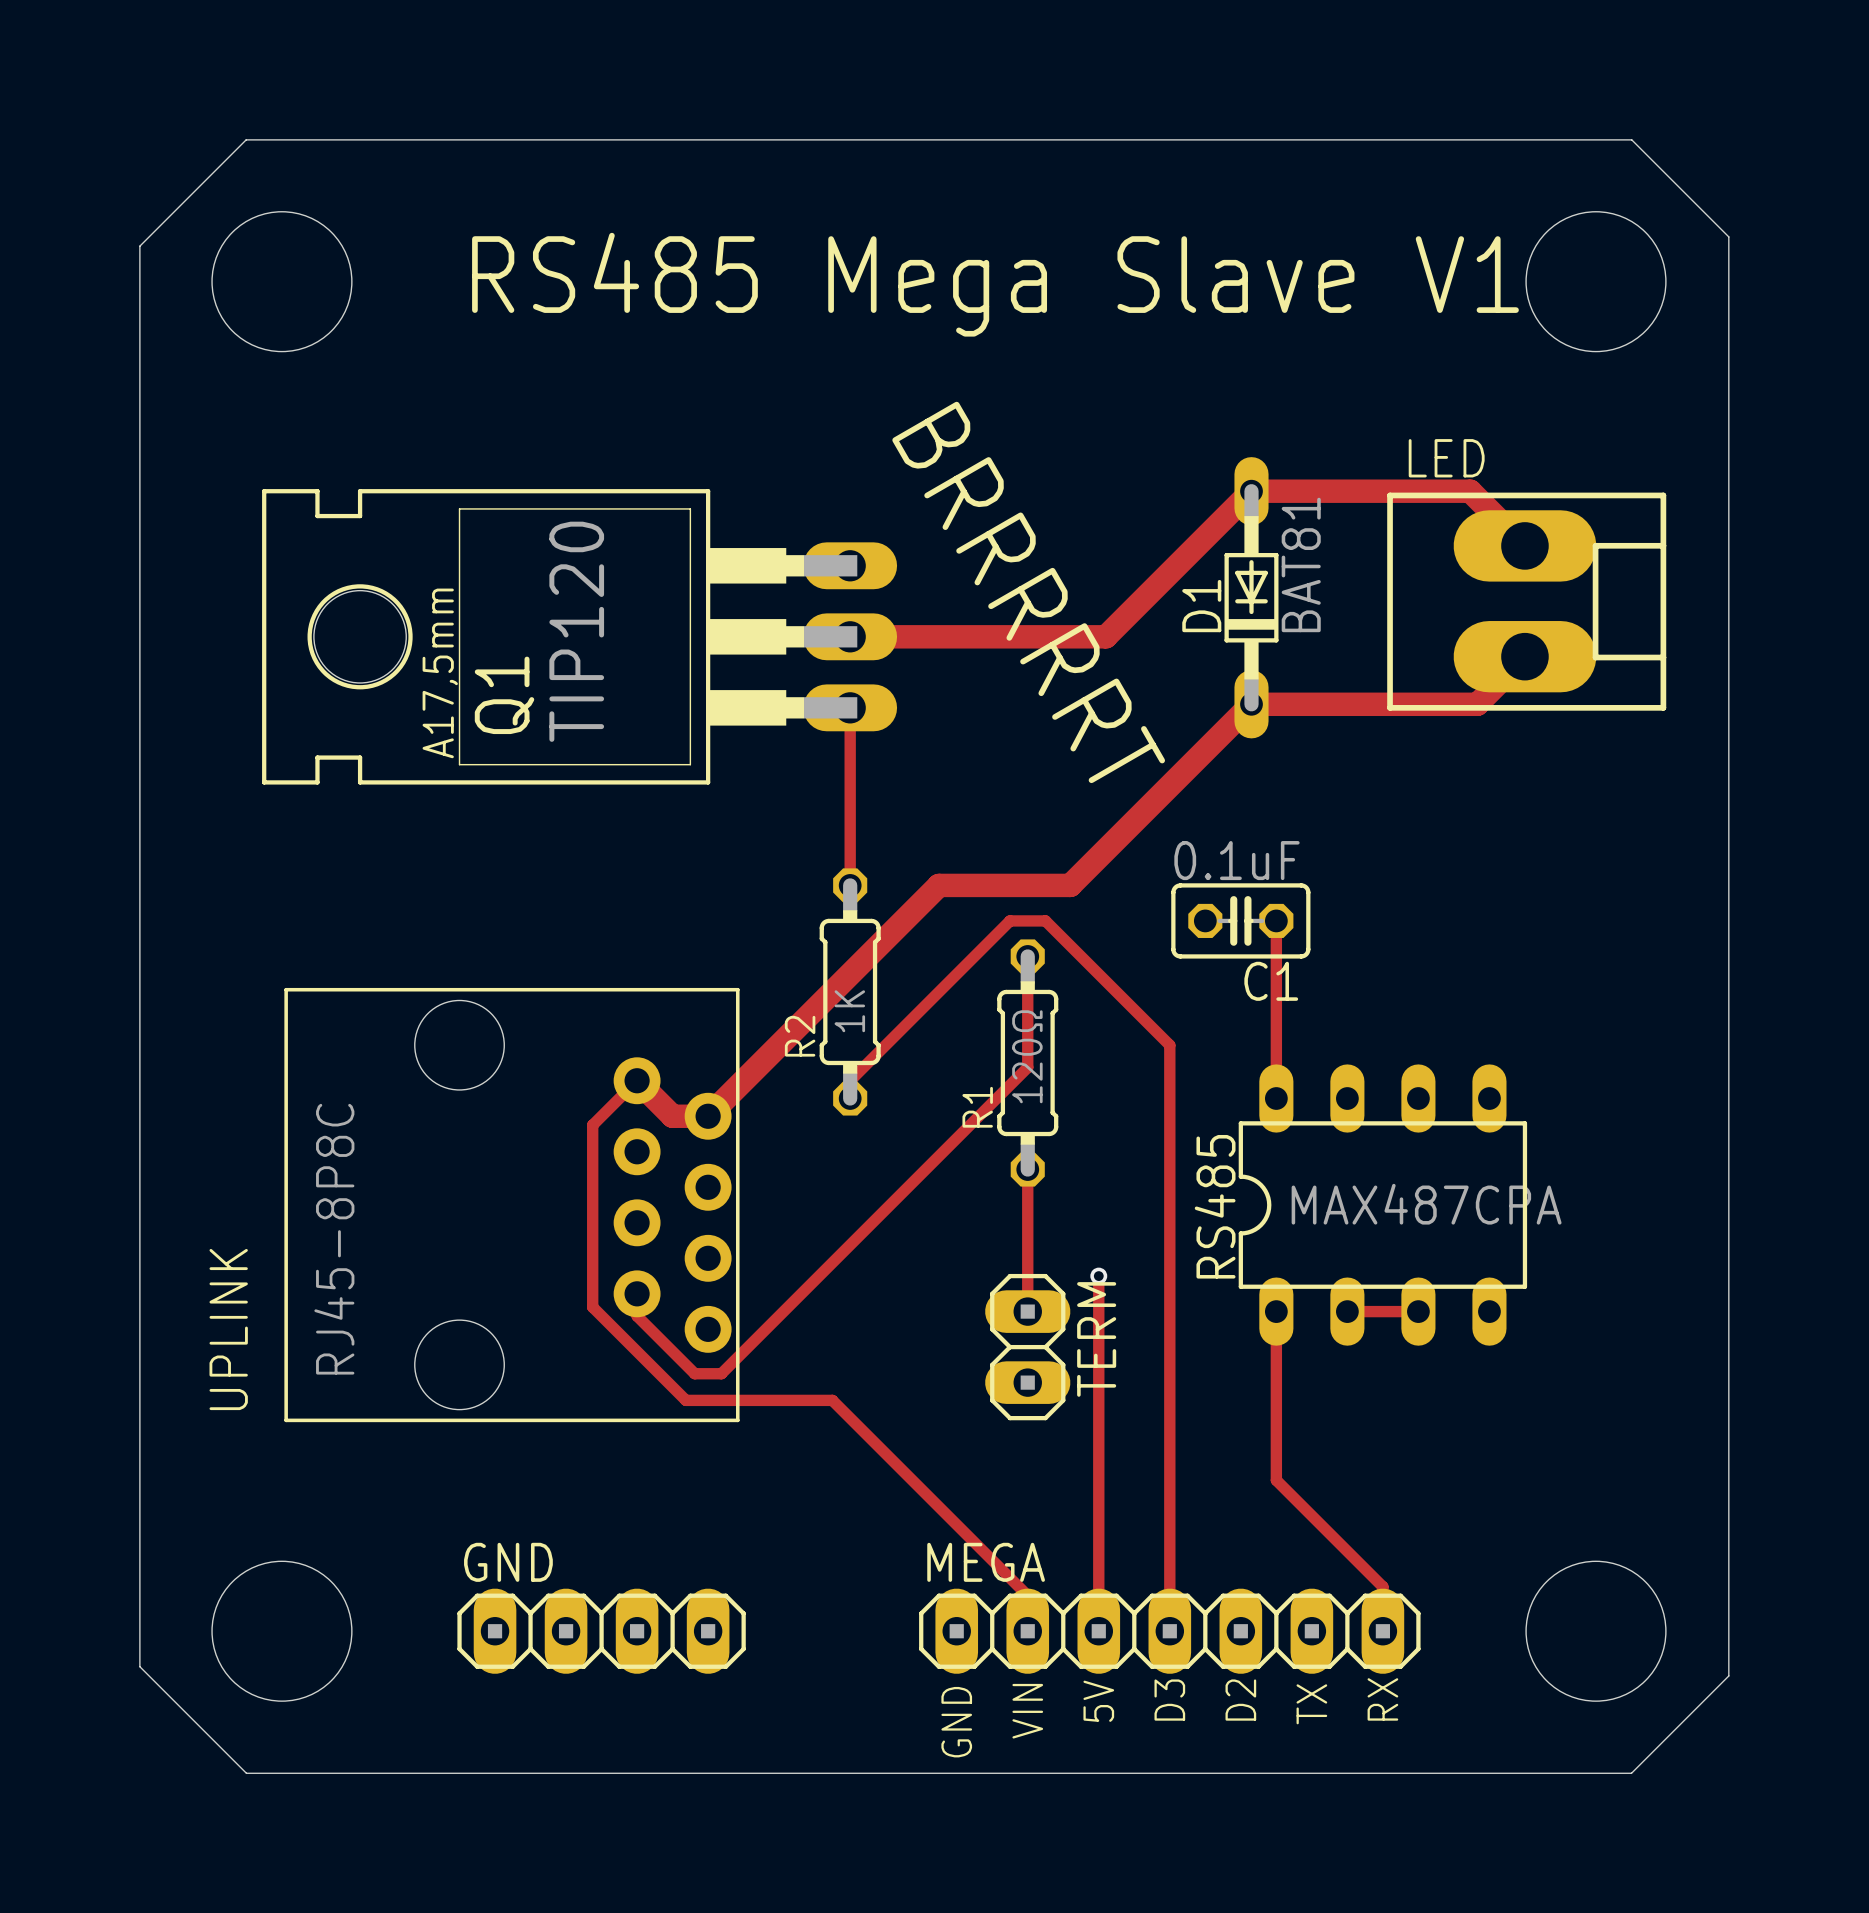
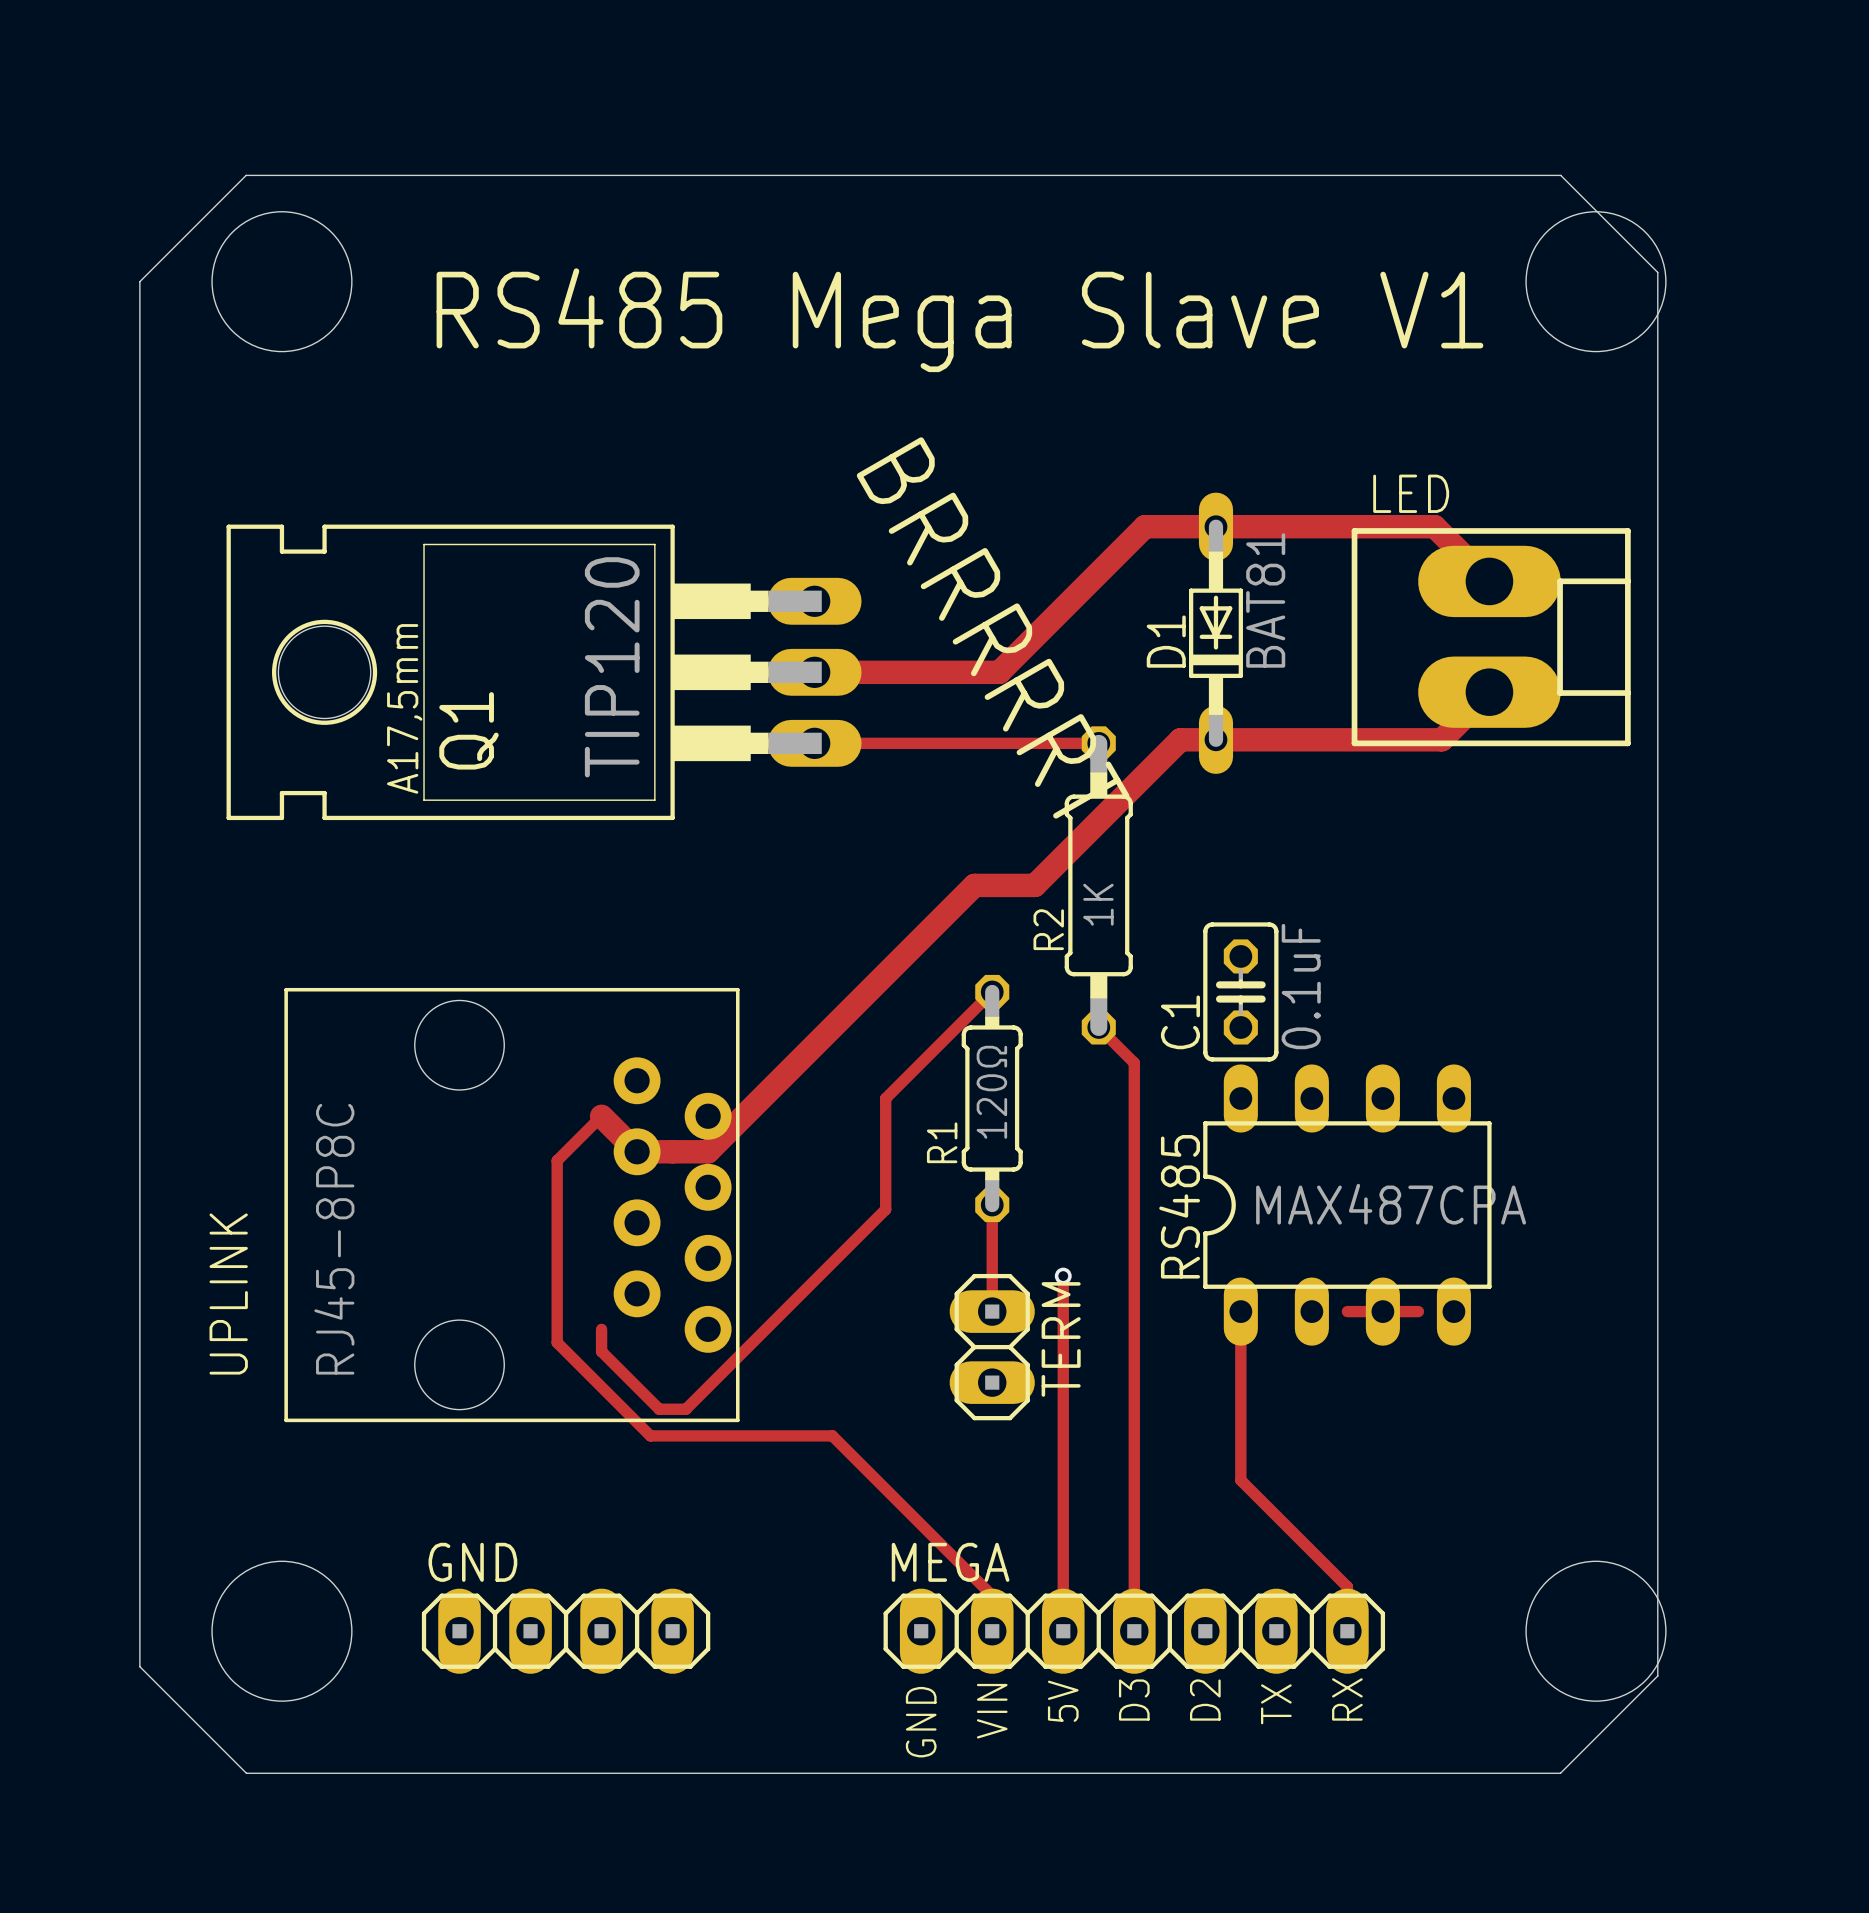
board edge: (139, 281) (139, 246) (246, 139) (1631, 139) (1728, 236) (1728, 1675) (1631, 1773) (1560, 1773) -> (139, 281) (246, 175) (1560, 175) (1657, 272) (1657, 1675) (1560, 1773)
text position: RS485 Mega Slave V1 (995, 284) -> RS485 Mega Slave V1 (959, 320)
track: (1524, 545) (1470, 491) (1251, 491) (1105, 636) (850, 636) -> none
track: none -> (1489, 581) (1434, 526) (1144, 526) (999, 672) (814, 672)
text position: BRRRRRT (1028, 592) -> BRRRRRT (993, 627)
D1 position: (1251, 597) -> (1215, 633)
LED position: (1526, 601) -> (1491, 637)
Q1 value position: TIP120 (576, 631) -> TIP120 (612, 667)
Q1 position: (579, 636) -> (544, 672)
track: (1477, 704) (1251, 704) (1070, 885) (1034, 885) -> (1477, 704) (1441, 739) (1180, 739) (1034, 885)
track: (850, 707) (850, 885) -> none
track: none -> (814, 743) (1098, 743)
R2 footprint: [819, 868, 881, 1116] -> [1064, 726, 1133, 1045]
track: (974, 885) (938, 885) (708, 1116) (672, 1116) (637, 1080) (601, 1116) -> (974, 885) (708, 1151) (637, 1151) (601, 1116)
C1 rotation: 0° (1240, 920) -> 90° clockwise (1240, 991)
track: (1276, 920) (1276, 1098) -> none
track: (1027, 956) (1027, 1067) (885, 1209) -> (992, 991) (885, 1098) (885, 1209)
track: none -> (1098, 1027) (1134, 1062) (1134, 1631)
R1 position: (1027, 1062) -> (992, 1098)
track: (850, 1098) (850, 1080) (1010, 920) (1045, 920) (1169, 1045) (1169, 1631) -> none
track: (592, 1125) (592, 1307) (685, 1400) (832, 1400) (1027, 1595) (1027, 1631) -> (592, 1125) (557, 1160) (557, 1342) (650, 1435) (832, 1435) (992, 1595) (992, 1631)
track: (1027, 1169) (1027, 1311) -> none
track: none -> (992, 1205) (992, 1311)
RS485 position: (1382, 1205) -> (1347, 1205)
track: (1098, 1276) (1098, 1631) -> (1063, 1276) (1063, 1631)
via position: (1098, 1276) -> (1063, 1276)
track: (637, 1293) (637, 1316) (694, 1373) (721, 1373) -> (601, 1329) (601, 1351) (659, 1409) (685, 1409) (721, 1373)
track: (1276, 1311) (1276, 1480) (1382, 1586) (1382, 1631) -> (1240, 1311) (1240, 1480) (1347, 1586) (1347, 1631)
UPLINK name position: UPLINK (228, 1329) -> UPLINK (228, 1294)
TERM position: (1027, 1347) -> (992, 1347)
GND position: (601, 1631) -> (566, 1631)
MEGA position: (1169, 1631) -> (1134, 1631)
text position: RX (1382, 1699) -> RX (1347, 1699)
text position: D3 (1169, 1700) -> D3 (1134, 1700)
text position: D2 (1240, 1700) -> D2 (1205, 1700)
text position: 5V (1098, 1701) -> 5V (1063, 1701)
text position: TX (1311, 1704) -> TX (1276, 1704)
text position: VIN (1027, 1711) -> VIN (992, 1711)
text position: GND (956, 1722) -> GND (921, 1722)

